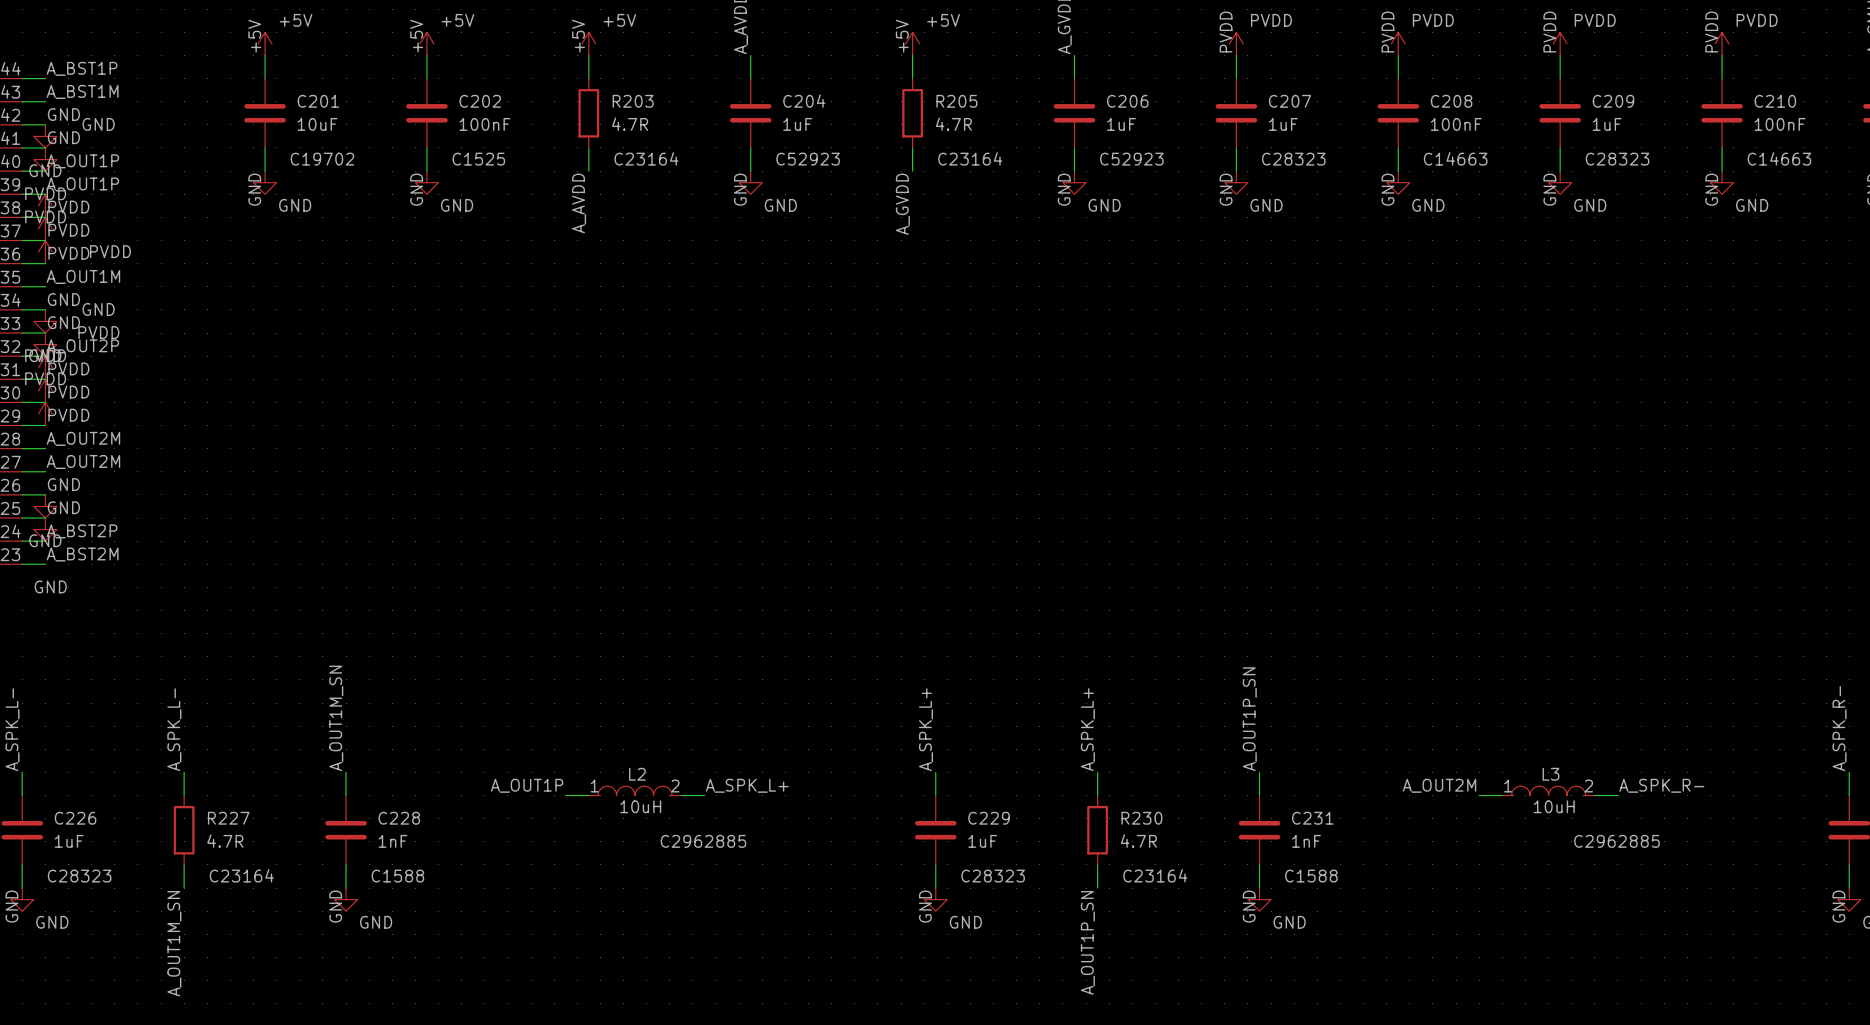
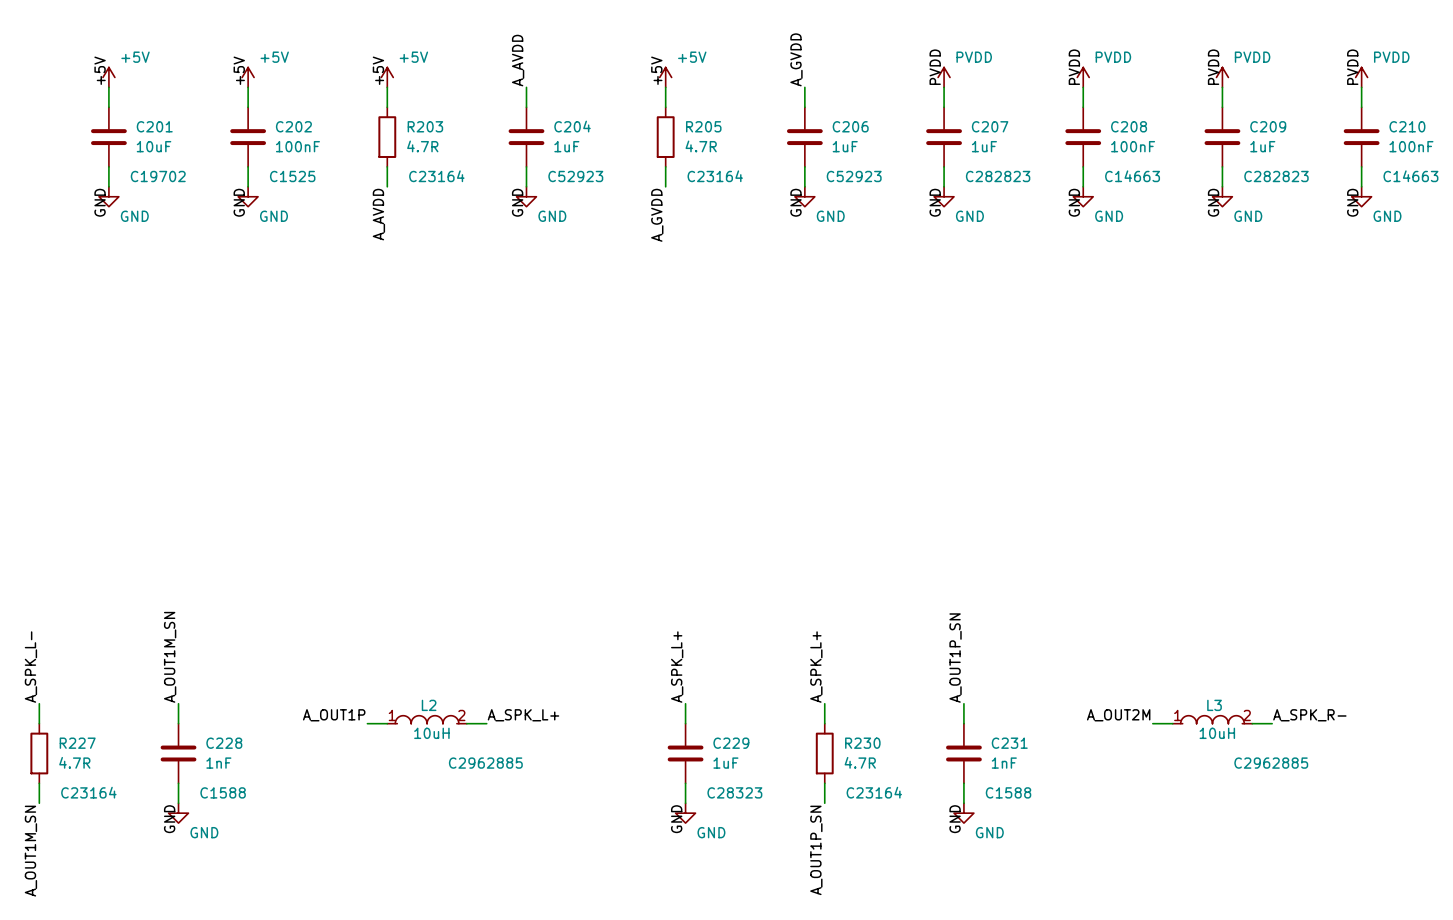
C207 text: C28323 (1293, 159) -> C282823 (998, 176)
C209 text: C28323 (1617, 159) -> C282823 (1276, 176)

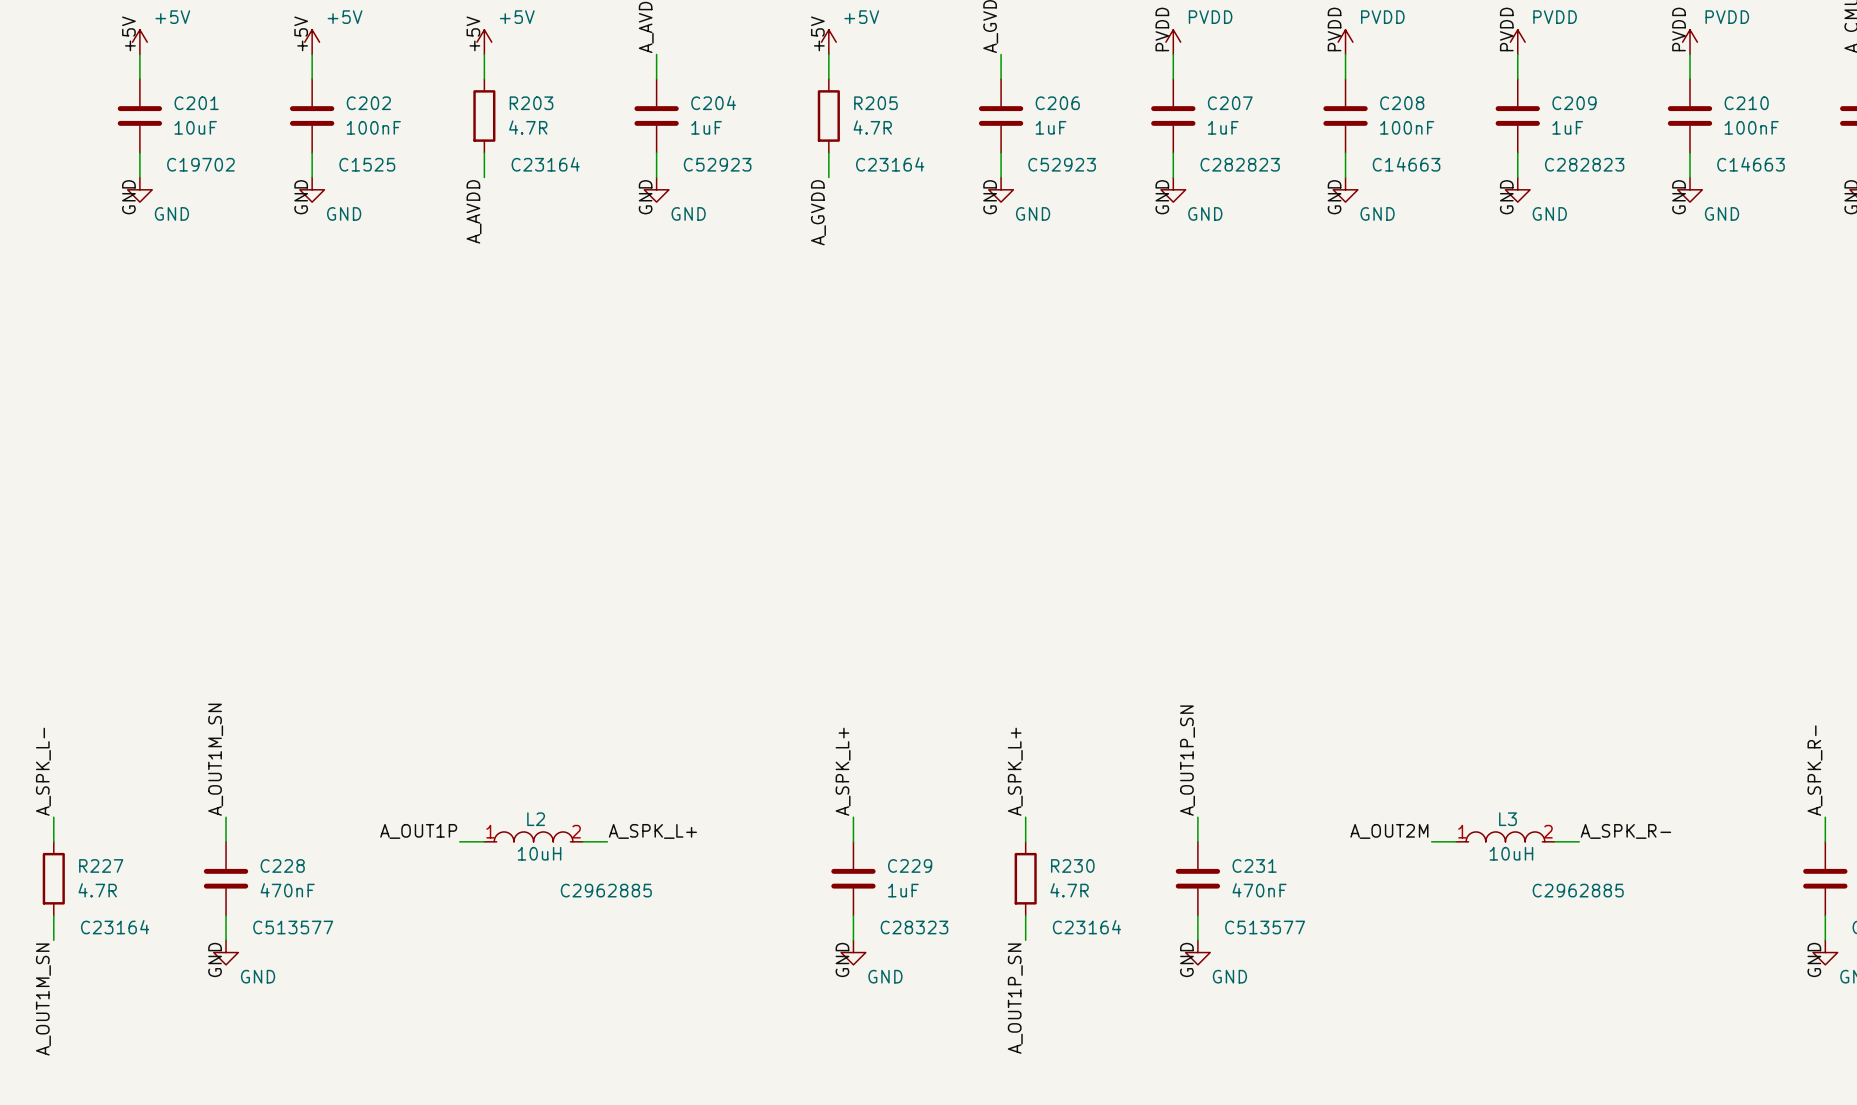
C228 value: 1nF (218, 763) -> 470nF (287, 890)
C231 value: 1nF (1004, 763) -> 470nF (1259, 890)
C228 text: C1588 (223, 792) -> C513577 (293, 927)
C231 text: C1588 (1008, 792) -> C513577 (1265, 927)

